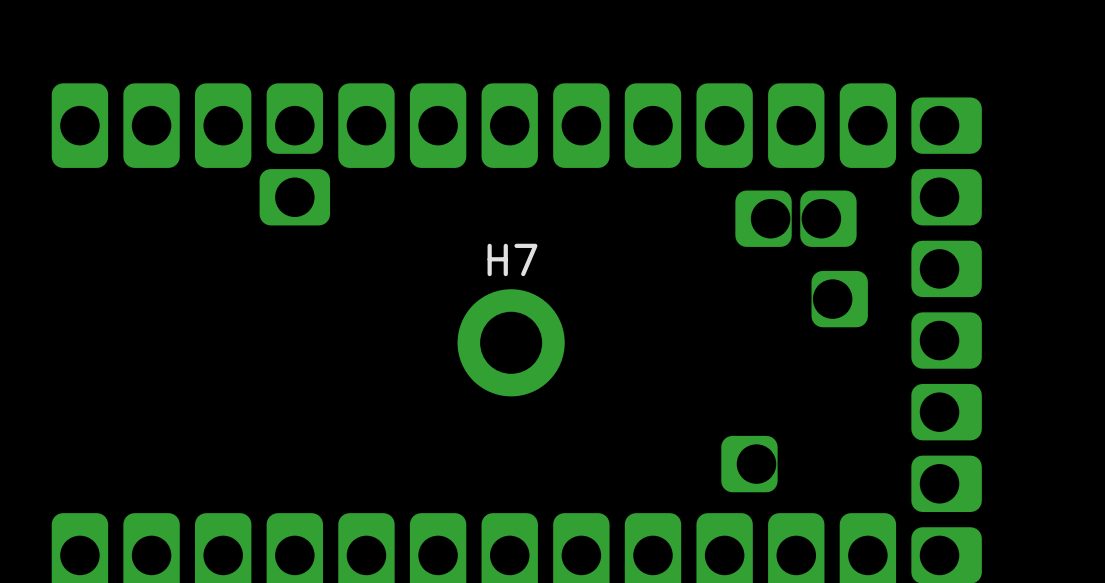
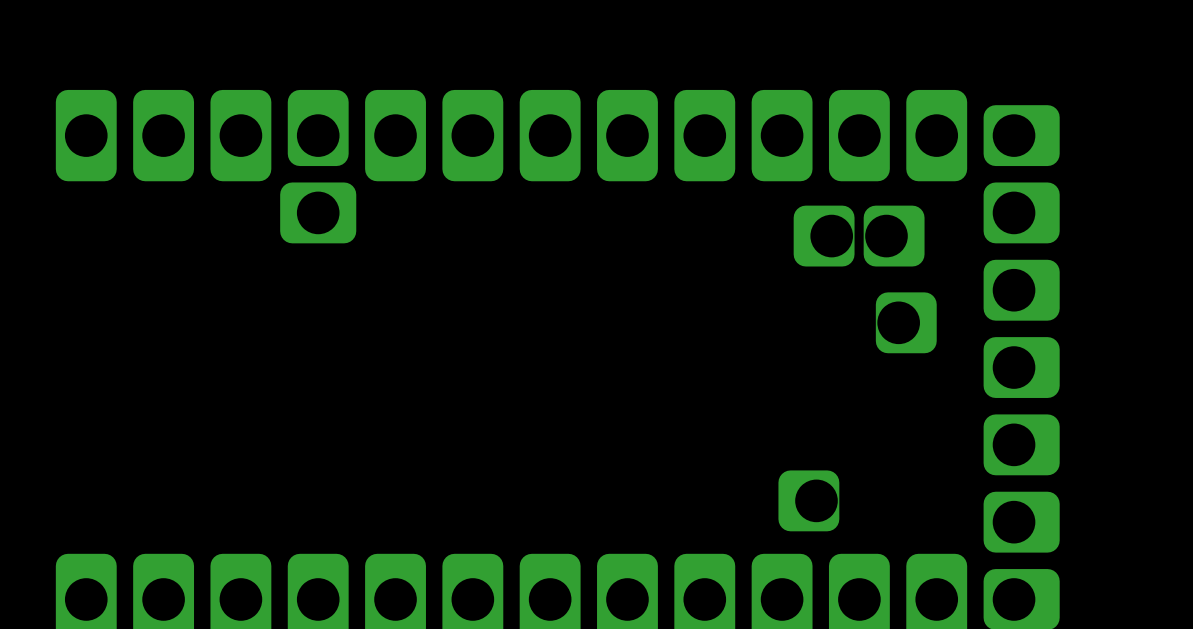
H7: (511, 342) -> none

